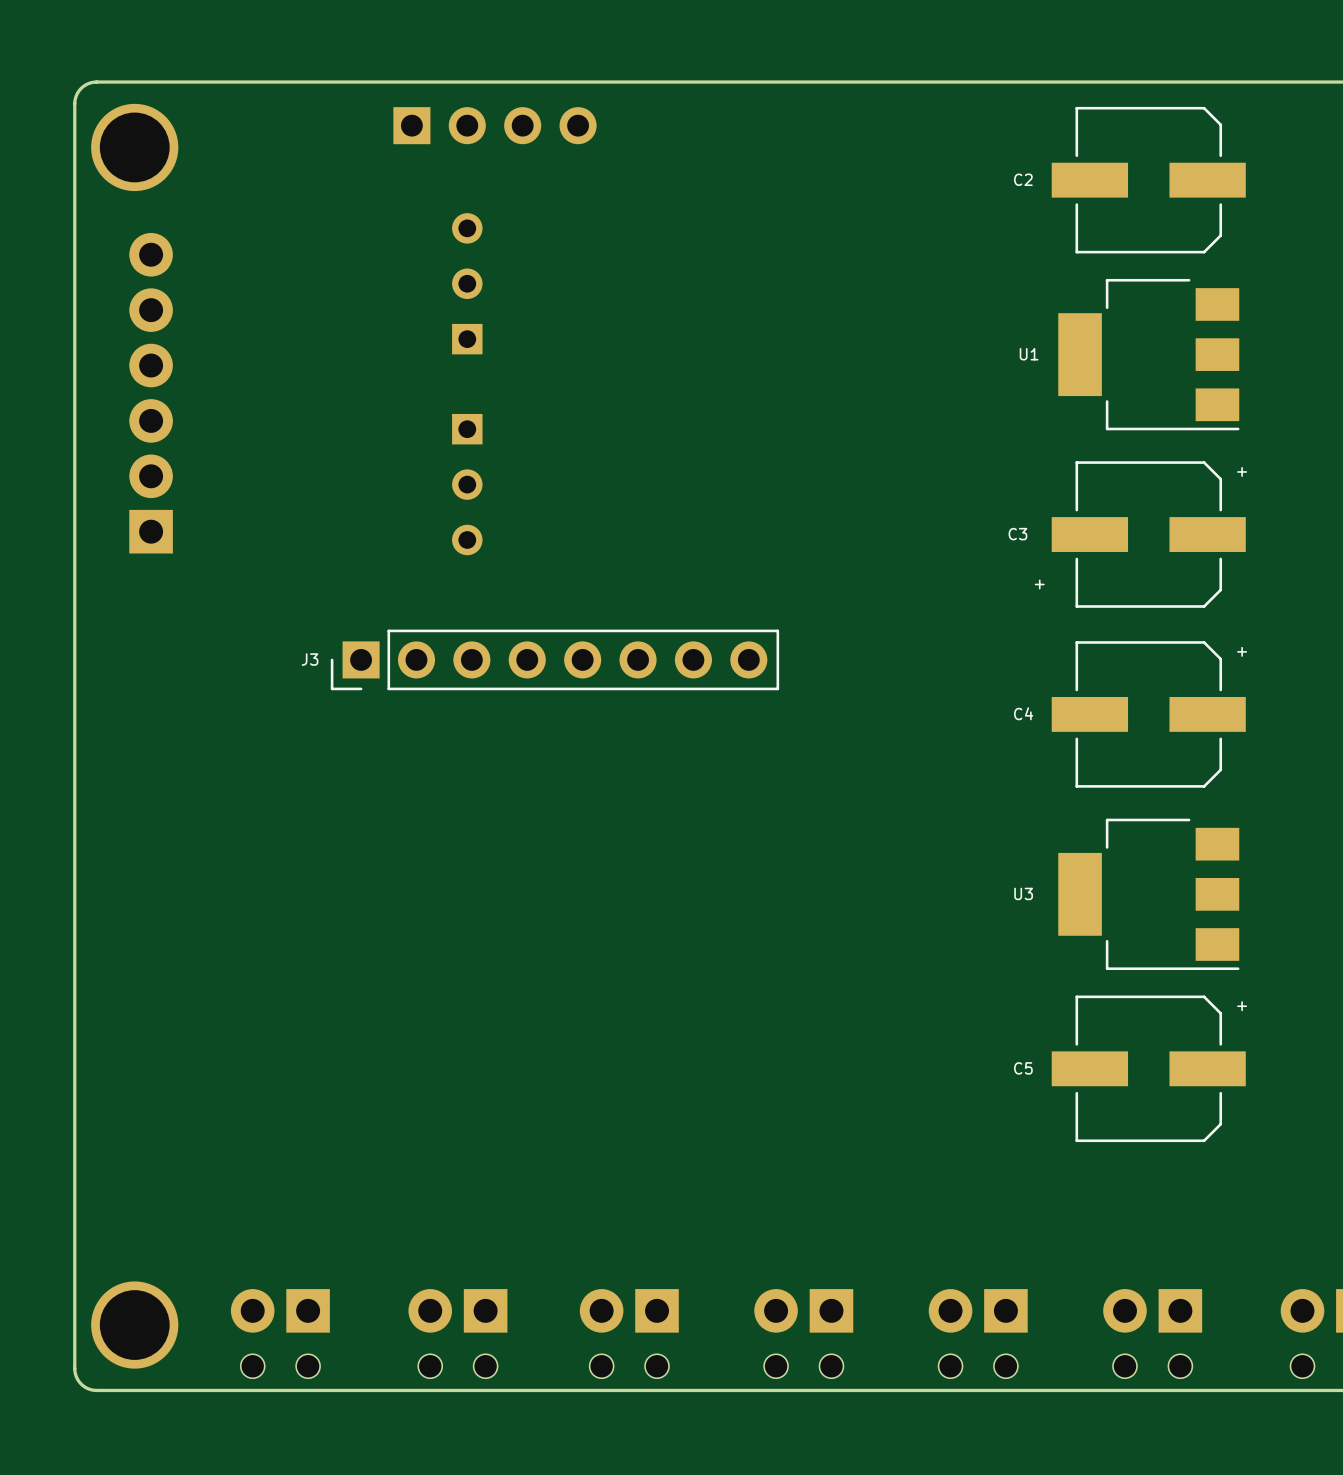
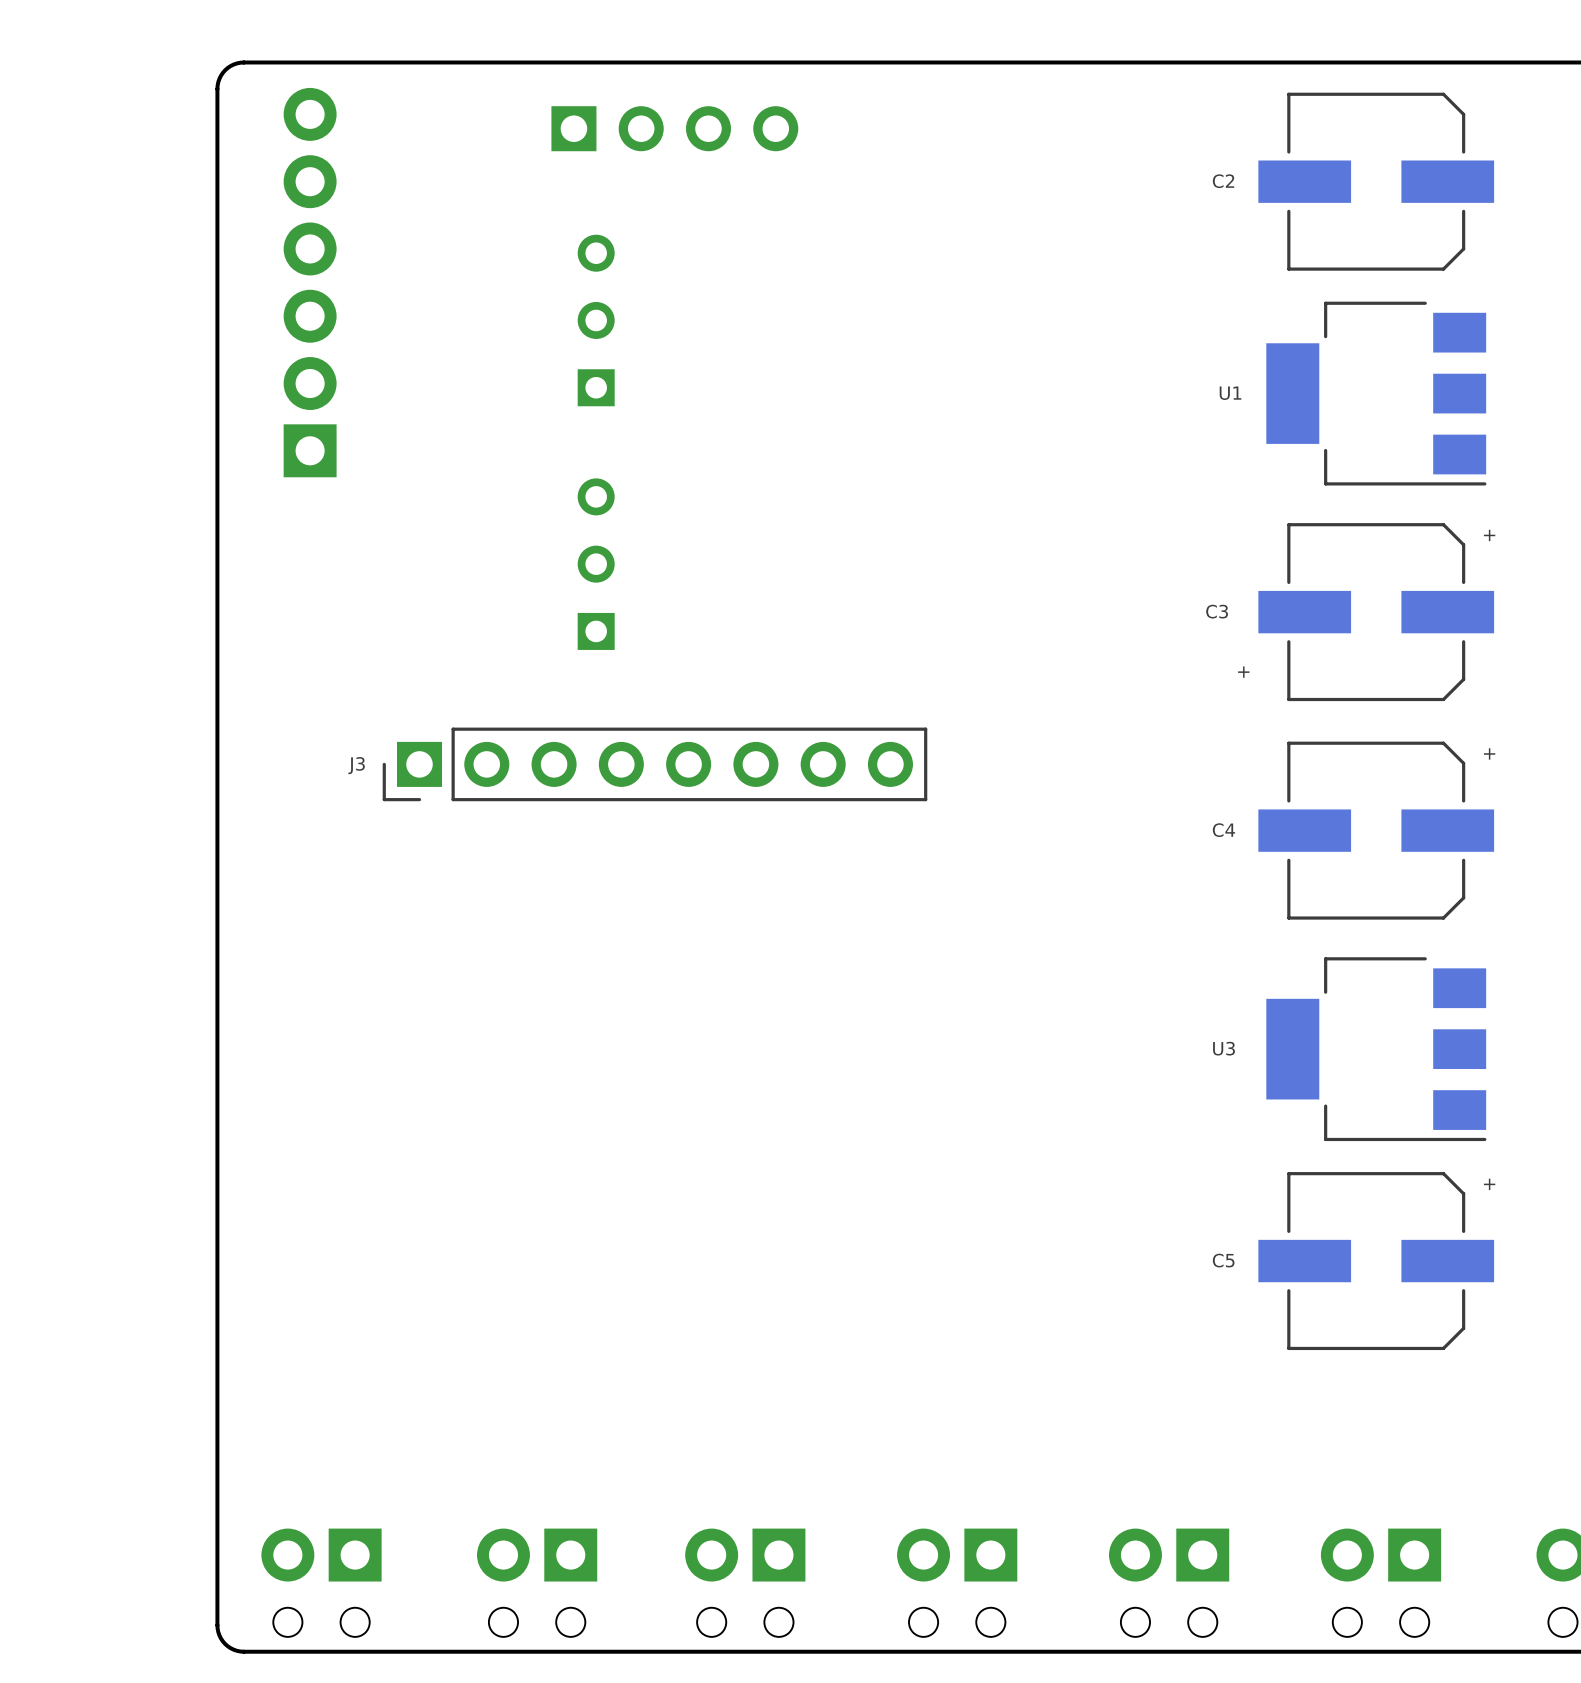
board edge: (216, 82) (93, 82) (85, 84) (79, 90) (74, 103) (74, 1371) (81, 1384) (93, 1390) (216, 1390) -> (243, 62) (233, 64) (225, 70) (219, 78) (217, 88) (217, 1625) (219, 1635) (225, 1643) (233, 1649) (243, 1651)
part position: (494, 125) -> (674, 128)
part: (134, 147) -> none
part position: (467, 283) -> (596, 320)
part position: (151, 393) -> (310, 282)
part rotation: 0° (467, 484) -> 180° (596, 564)
part: (134, 1325) -> none

